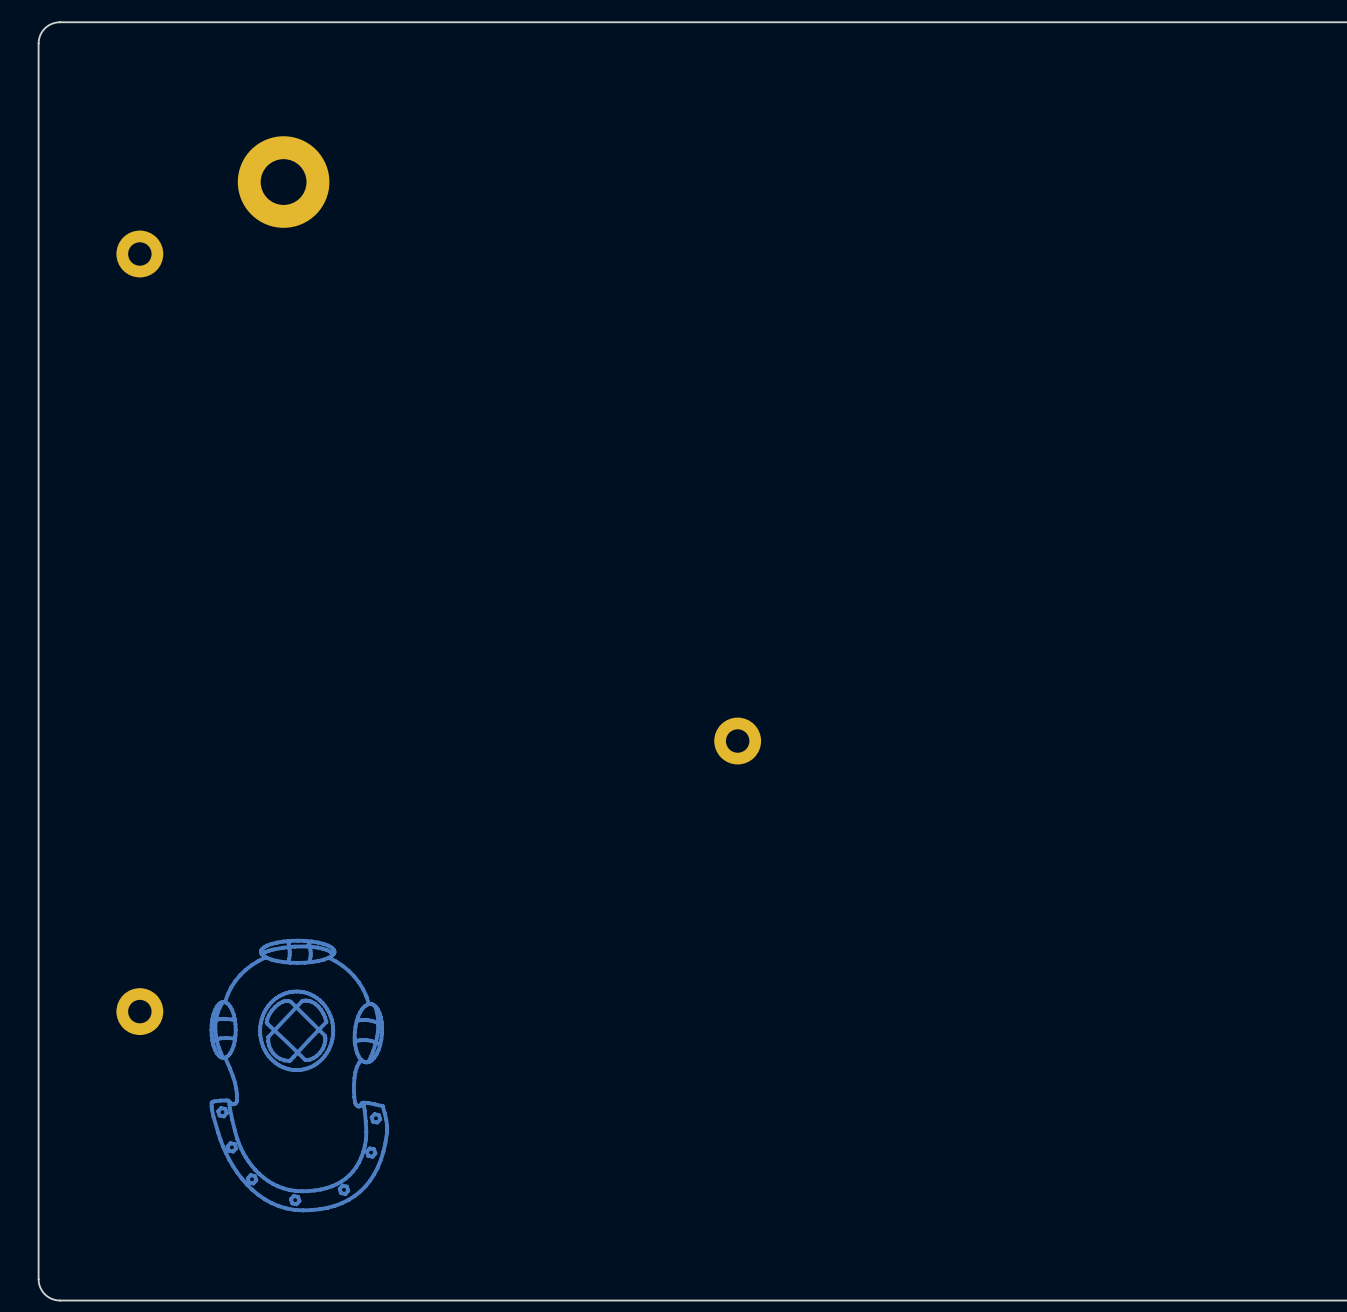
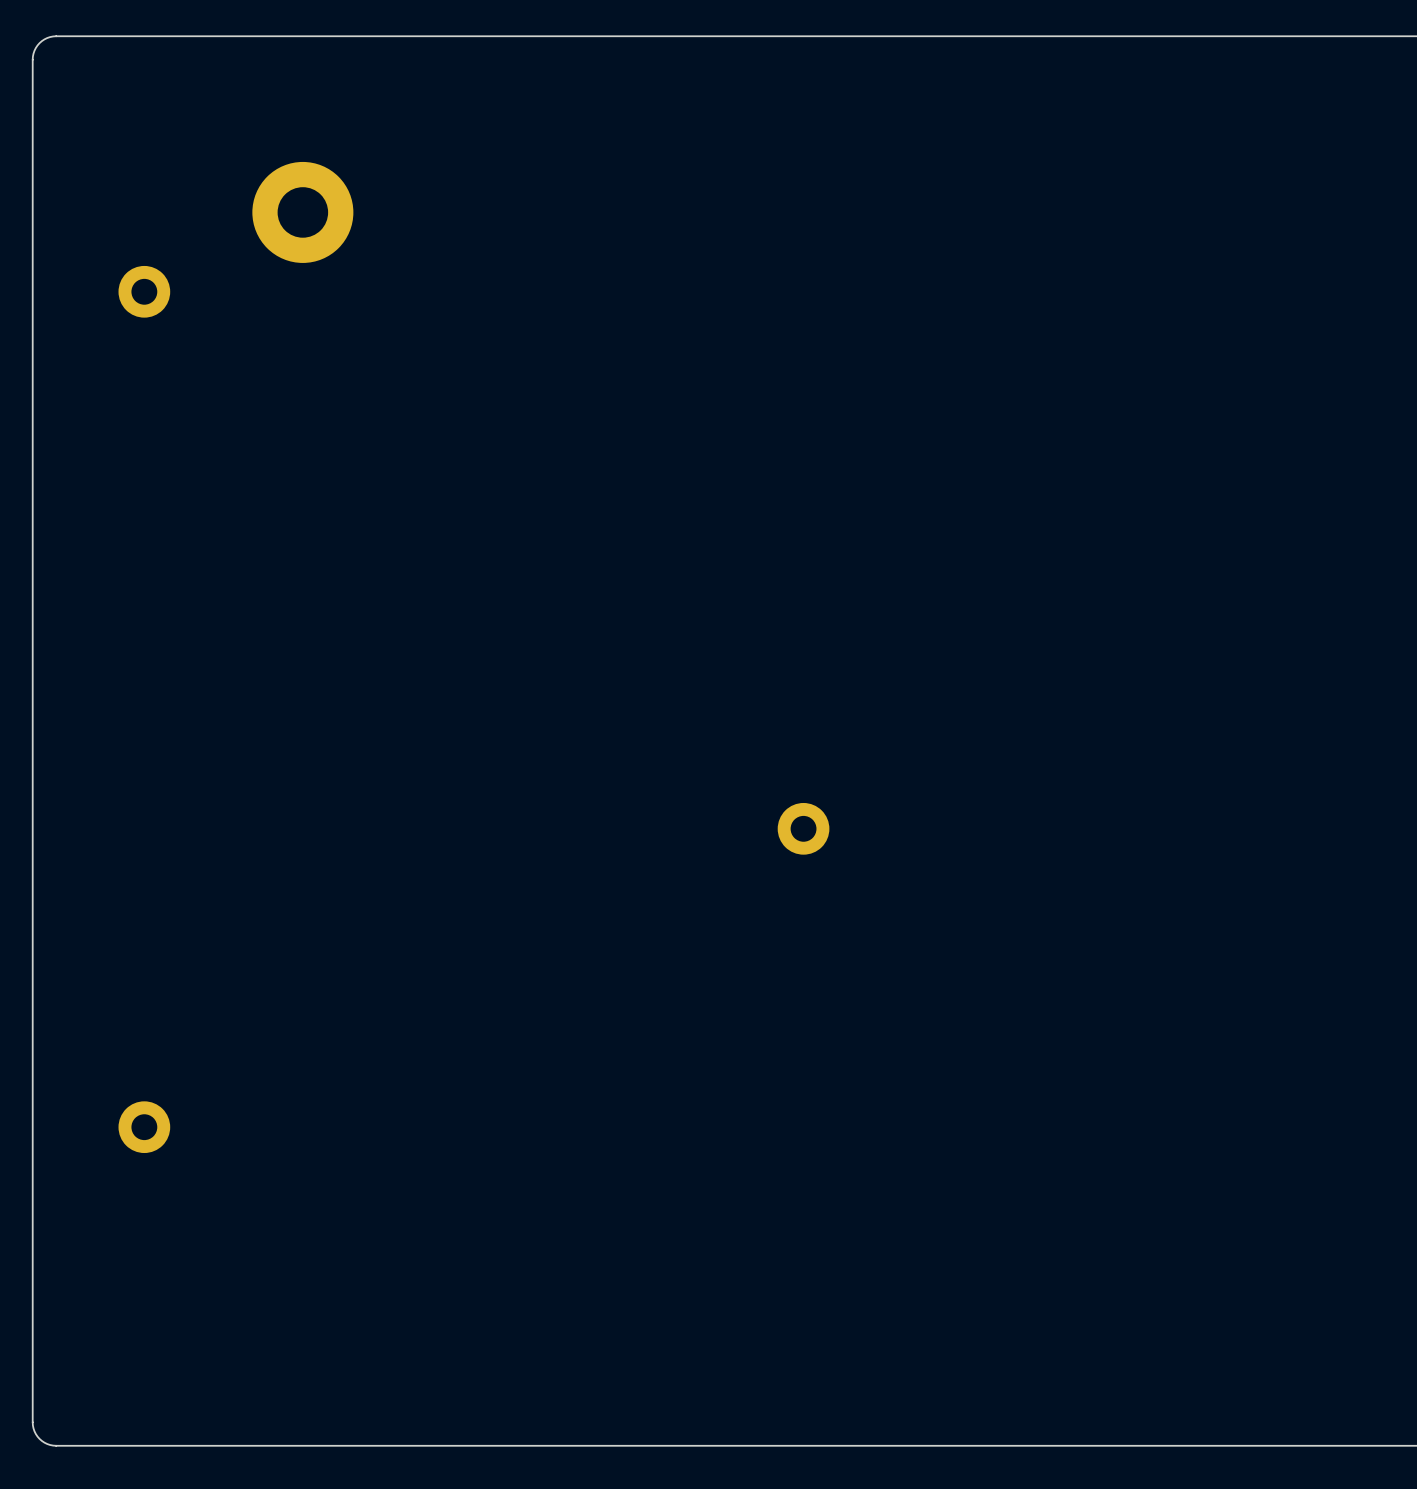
track: (297, 940) (271, 943) (263, 947) (261, 952) (271, 959) (297, 962) (323, 959) (334, 952) (331, 947) (323, 943) (297, 940) -> none
track: (288, 941) (288, 961) -> none
track: (308, 941) (310, 953) (309, 961) -> none
track: (333, 954) (322, 948) (306, 946) (283, 947) (261, 954) -> none
track: (265, 957) (251, 965) (240, 975) (231, 987) (225, 1001) -> none
track: (328, 957) (342, 965) (354, 976) (363, 989) (368, 1003) -> none
track: (296, 991) (282, 994) (270, 1003) (262, 1015) (260, 1030) (262, 1046) (270, 1058) (282, 1067) (296, 1070) (310, 1067) (322, 1058) (330, 1046) (333, 1030) (330, 1015) (322, 1003) (310, 994) (296, 991) -> none
track: (287, 1000) (290, 1001) (325, 1035) (322, 1049) (313, 1058) (305, 1059) (266, 1022) (275, 1006) (287, 1000) -> none
track: (307, 1000) (318, 1006) (326, 1022) (290, 1060) (280, 1058) (270, 1049) (268, 1037) (302, 1000) (307, 1000) -> none
track: (223, 1001) (228, 1004) (232, 1010) (235, 1029) (232, 1049) (228, 1055) (223, 1057) (218, 1055) (215, 1049) (211, 1029) (215, 1010) (218, 1004) (223, 1001) -> none
track: (222, 1002) (217, 1012) (215, 1026) (216, 1039) (223, 1057) -> none
track: (370, 1003) (364, 1006) (360, 1012) (354, 1032) (357, 1053) (361, 1059) (366, 1062) (371, 1060) (376, 1054) (382, 1033) (379, 1012) (375, 1006) (370, 1003) -> none
track: (375, 1007) (378, 1031) (368, 1061) -> none
track: (234, 1019) (222, 1018) (212, 1022) -> none
track: (357, 1020) (371, 1020) (381, 1026) -> none
track: (234, 1038) (220, 1038) (212, 1041) -> none
track: (354, 1041) (367, 1040) (379, 1044) -> none
track: (225, 1058) (234, 1082) (236, 1101) (233, 1104) (228, 1100) (214, 1101) (211, 1102) (211, 1106) (220, 1139) (229, 1159) (246, 1184) (264, 1199) (286, 1208) (303, 1210) (335, 1205) (354, 1196) (369, 1180) (380, 1159) (387, 1129) (382, 1106) (363, 1102) (358, 1106) (355, 1102) (354, 1078) (356, 1067) (361, 1060) -> none
track: (229, 1102) (237, 1139) (251, 1165) (272, 1183) (289, 1189) (302, 1191) (320, 1189) (336, 1184) (349, 1175) (356, 1167) (363, 1151) (366, 1139) (363, 1103) -> none
track: (221, 1108) (225, 1108) (226, 1113) (223, 1116) (219, 1115) (218, 1111) (221, 1108) -> none
track: (374, 1114) (378, 1115) (380, 1119) (377, 1122) (373, 1121) (371, 1117) (374, 1114) -> none
track: (230, 1143) (227, 1146) (228, 1150) (233, 1151) (236, 1148) (234, 1144) (230, 1143) -> none
track: (369, 1148) (366, 1151) (368, 1155) (372, 1156) (375, 1153) (374, 1149) (369, 1148) -> none
track: (250, 1175) (247, 1178) (249, 1182) (253, 1183) (256, 1180) (254, 1176) (250, 1175) -> none
track: (342, 1185) (339, 1188) (341, 1193) (345, 1194) (348, 1190) (346, 1186) (342, 1185) -> none
track: (293, 1195) (298, 1196) (299, 1201) (296, 1204) (292, 1203) (290, 1199) (293, 1195) -> none

